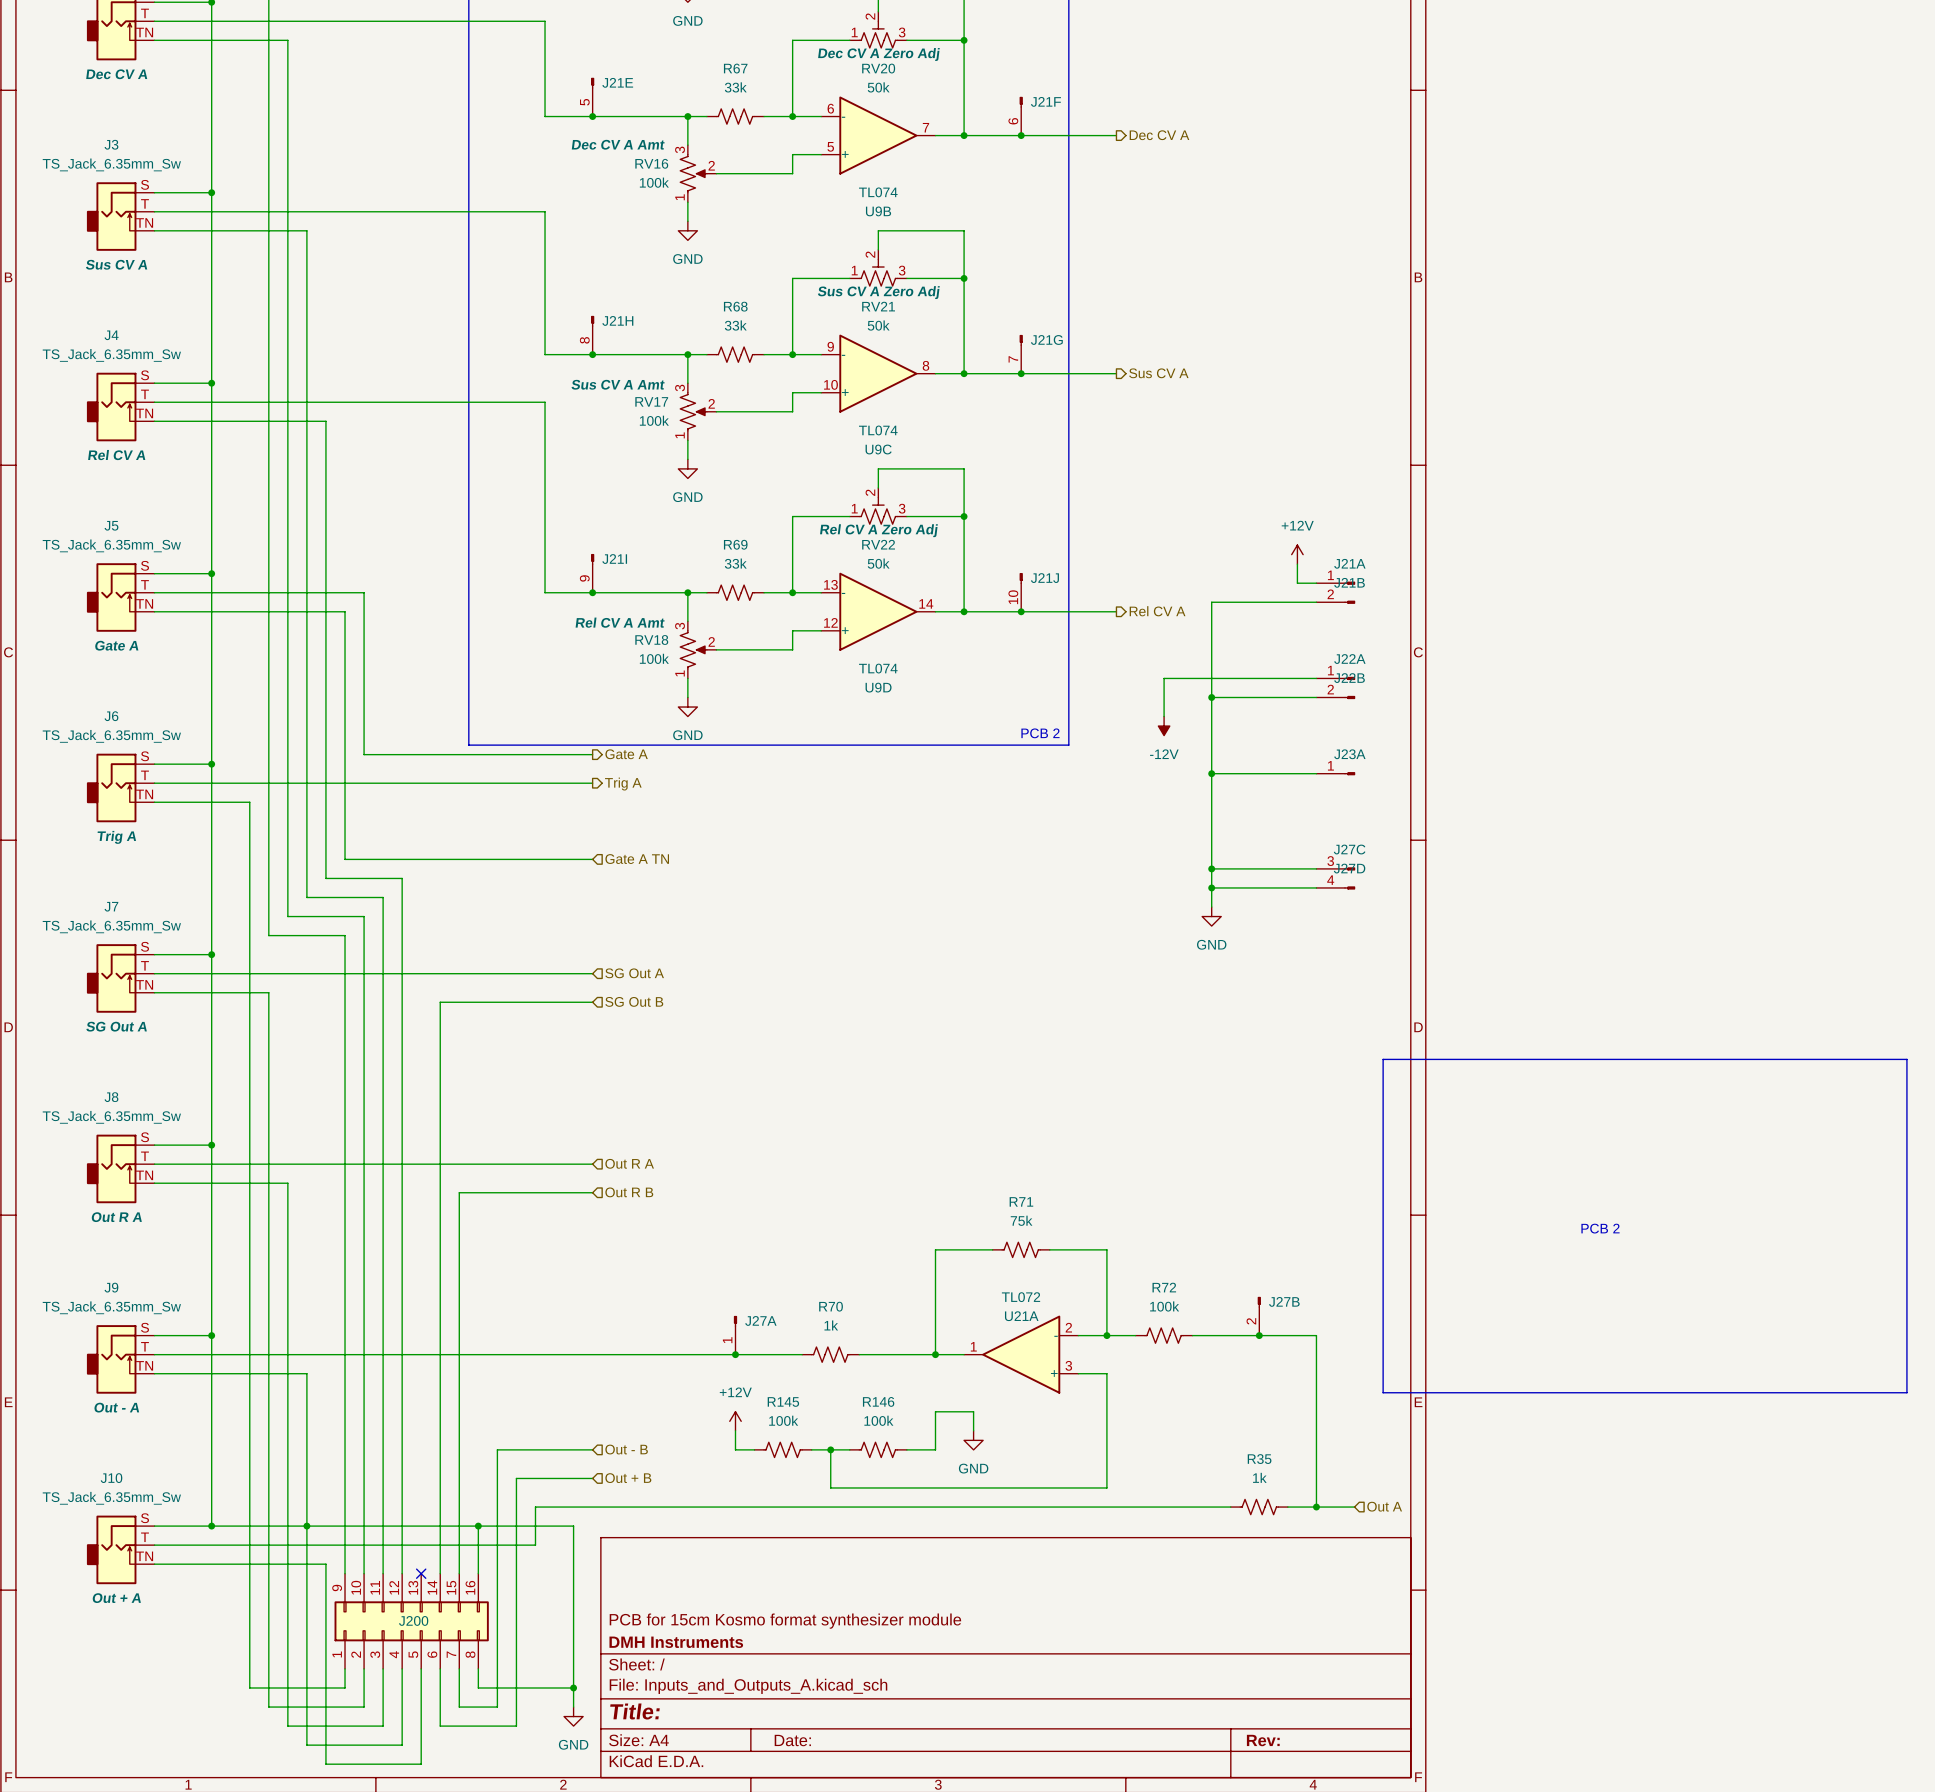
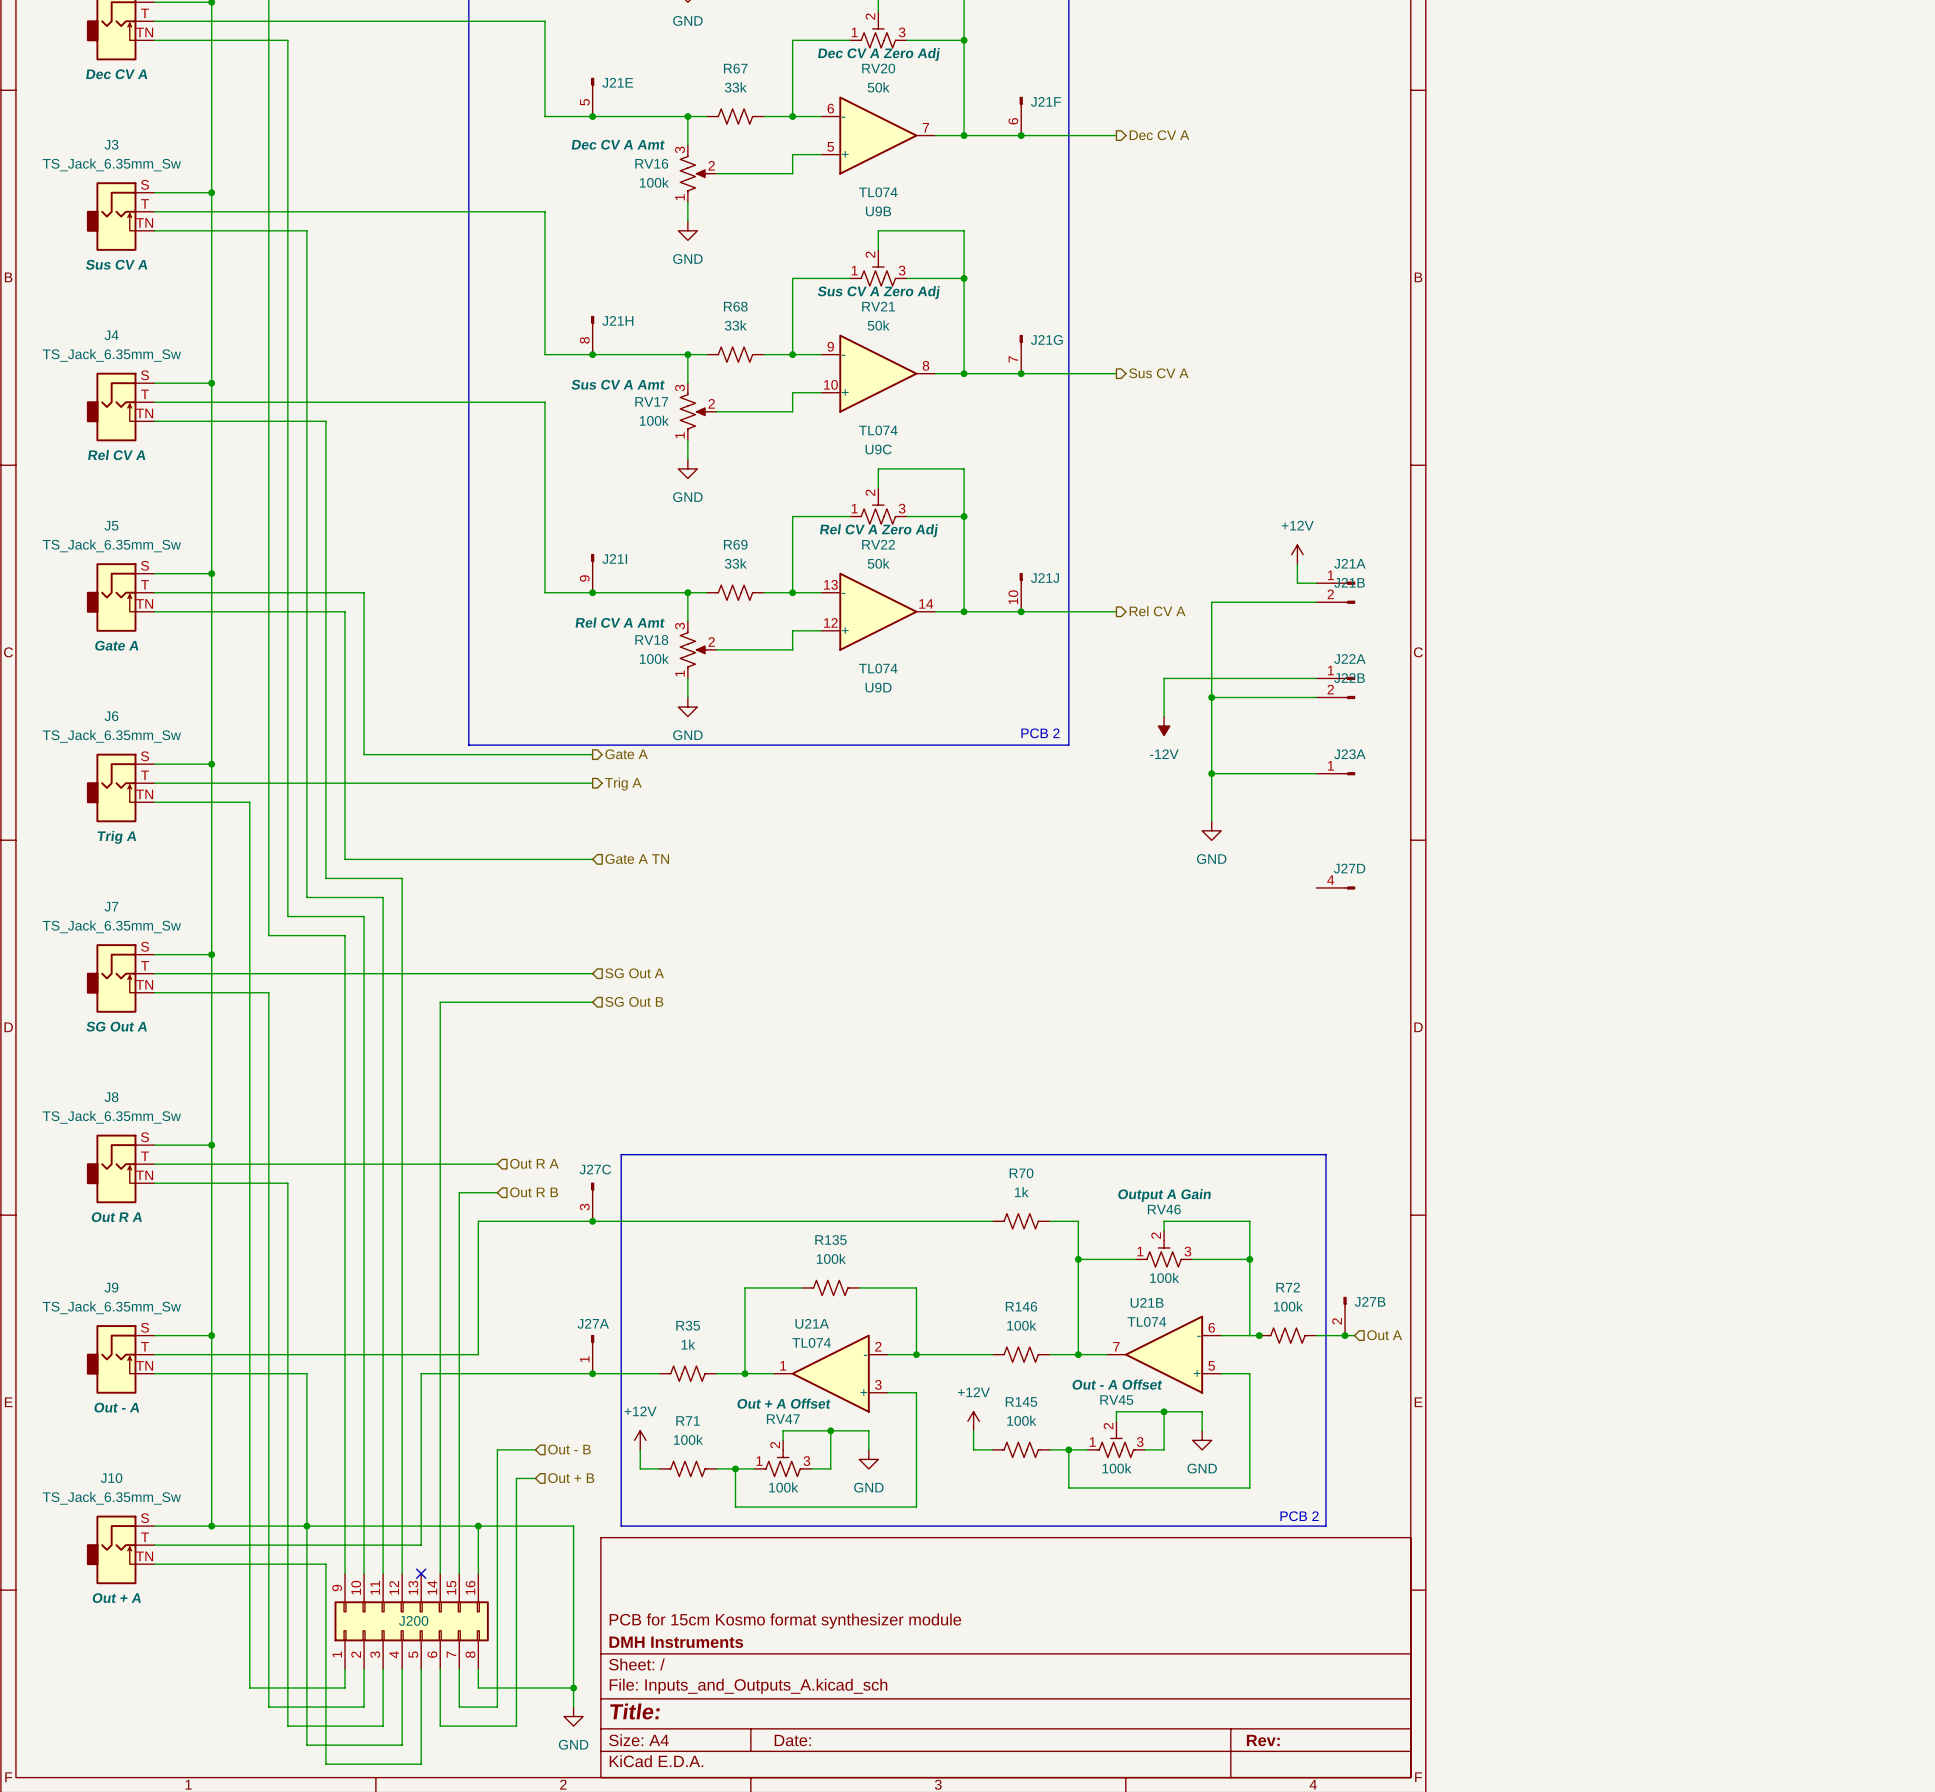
wire: (1211, 821) (1211, 907) -> none
wire: (1211, 868) (1316, 868) -> none
junction: (1211, 868) -> none
J27C position: (1335, 868) -> (592, 1201)
J27C rotation: 0° (1349, 868) -> 90° counterclockwise (592, 1187)
wire: (1211, 887) (1316, 887) -> none
junction: (1211, 887) -> none
power symbol position: GND (1211, 916) -> GND (1211, 830)
line: (1383, 1059) (1906, 1059) (1906, 1392) (1383, 1392) (1383, 1059) -> none
line: none -> (621, 1154) (1325, 1154) (1325, 1526) (621, 1526) (621, 1154)
hierarchical label position: Out R A (629, 1163) -> Out R A (534, 1163)
wire: (497, 1164) (592, 1164) -> none
wire: (497, 1192) (592, 1192) -> none
hierarchical label position: Out R B (629, 1192) -> Out R B (534, 1192)
R71 value: 75k (1021, 1220) -> 100k (688, 1439)
junction: none -> (592, 1221)
wire: none -> (1049, 1221) (1078, 1221) (1078, 1354)
text: PCB 2 (1600, 1228) -> none
wire: none -> (1164, 1230) (1164, 1221) (1249, 1221) (1249, 1335)
RV46: none -> 100k (1164, 1248)
wire: (992, 1249) (935, 1249) (935, 1354) -> none
R71 position: (1021, 1249) -> (687, 1468)
wire: (1049, 1249) (1106, 1249) (1106, 1335) -> none
wire: none -> (1078, 1259) (1135, 1259)
junction: none -> (1078, 1259)
wire: none -> (1192, 1259) (1249, 1259)
junction: none -> (1249, 1259)
wire: none -> (802, 1287) (745, 1287) (745, 1373)
R135: none -> 100k (830, 1287)
wire: none -> (859, 1287) (916, 1287) (916, 1354)
U21A value: TL072 (1021, 1297) -> TL074 (811, 1342)
U21A name position: U21A (1021, 1316) -> U21A (812, 1323)
J27B position: (1259, 1316) -> (1345, 1316)
J27A name position: J27A (760, 1320) -> J27A (593, 1323)
J27A position: (735, 1335) -> (592, 1354)
wire: (1078, 1335) (1135, 1335) -> (1049, 1354) (1106, 1354)
junction position: (1106, 1335) -> (1078, 1354)
R72 position: (1164, 1335) -> (1287, 1335)
wire: (1259, 1335) (1316, 1335) (1316, 1507) -> none
wire: none -> (1316, 1335) (1354, 1335)
junction: none -> (1345, 1335)
wire: (478, 1354) (802, 1354) -> (478, 1354) (478, 1221) (992, 1221)
junction position: (735, 1354) -> (745, 1373)
R70 position: (830, 1354) -> (1021, 1221)
junction position: (935, 1354) -> (916, 1354)
U21A position: (1021, 1354) -> (830, 1373)
U21B: none -> TL074 (1164, 1354)
junction: none -> (592, 1373)
wire: none -> (716, 1373) (773, 1373)
wire: (1078, 1373) (1106, 1373) (1106, 1487) -> (1221, 1373) (1249, 1373) (1249, 1487) (1106, 1487)
wire: none -> (1164, 1411) (1164, 1449) (1145, 1449)
junction: none -> (1164, 1411)
power symbol position: +12V (735, 1421) -> +12V (640, 1440)
power symbol: none -> +12V (973, 1421)
wire: none -> (1116, 1421) (1116, 1411) (1202, 1411) (1202, 1430)
wire: (735, 1430) (735, 1449) (754, 1449) -> (640, 1449) (640, 1468) (659, 1468)
wire: none -> (830, 1430) (830, 1449)
wire: (973, 1430) (973, 1411) (935, 1411) (935, 1449) (906, 1449) -> (973, 1430) (973, 1449) (992, 1449)
RV45: none -> 100k (1116, 1439)
wire: none -> (783, 1440) (783, 1430) (868, 1430) (868, 1449)
power symbol position: GND (973, 1440) -> GND (868, 1459)
power symbol: none -> GND (1202, 1440)
wire: (535, 1449) (592, 1449) -> none
hierarchical label position: Out - B (626, 1449) -> Out - B (569, 1449)
R145 position: (783, 1449) -> (1021, 1449)
wire: (811, 1449) (849, 1449) -> (716, 1468) (754, 1468)
junction position: (830, 1449) -> (830, 1430)
R146 position: (878, 1449) -> (1021, 1354)
wire: none -> (1049, 1449) (1087, 1449)
junction: none -> (1068, 1449)
RV47: none -> 100k (783, 1458)
wire: none -> (735, 1468) (735, 1507)
junction: none -> (735, 1468)
wire: none -> (811, 1468) (830, 1468)
wire: (830, 1468) (830, 1487) (1068, 1487) -> (1068, 1449) (1068, 1487)
wire: (535, 1478) (592, 1478) -> none
hierarchical label position: Out + B (628, 1478) -> Out + B (571, 1478)
hierarchical label position: Out A (1384, 1506) -> Out A (1384, 1335)
wire: (735, 1507) (535, 1507) (535, 1545) (421, 1545) -> (659, 1373) (421, 1373) (421, 1545)
wire: (916, 1507) (1230, 1507) -> (916, 1507) (916, 1392) (887, 1392)
R35 position: (1259, 1507) -> (687, 1373)
wire: (1287, 1507) (1354, 1507) -> none
junction: (1316, 1507) -> none
text: none -> PCB 2 (1299, 1516)

